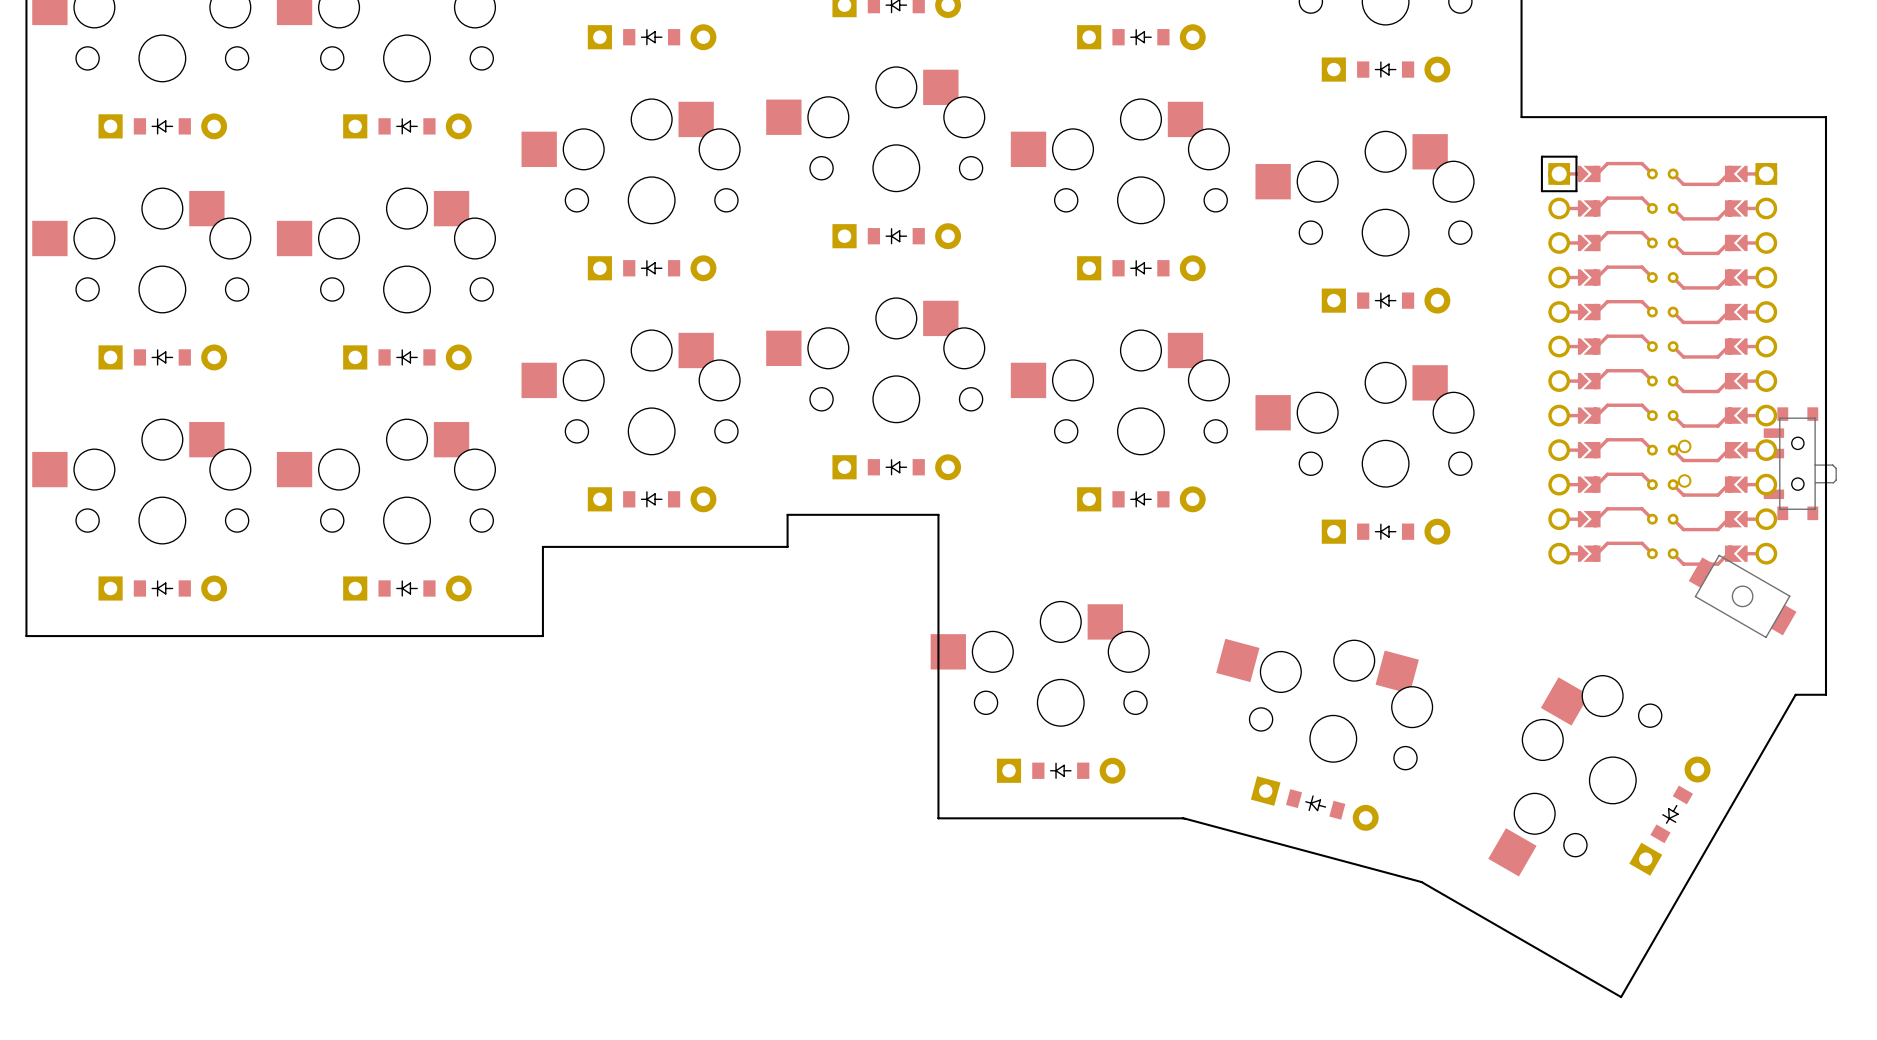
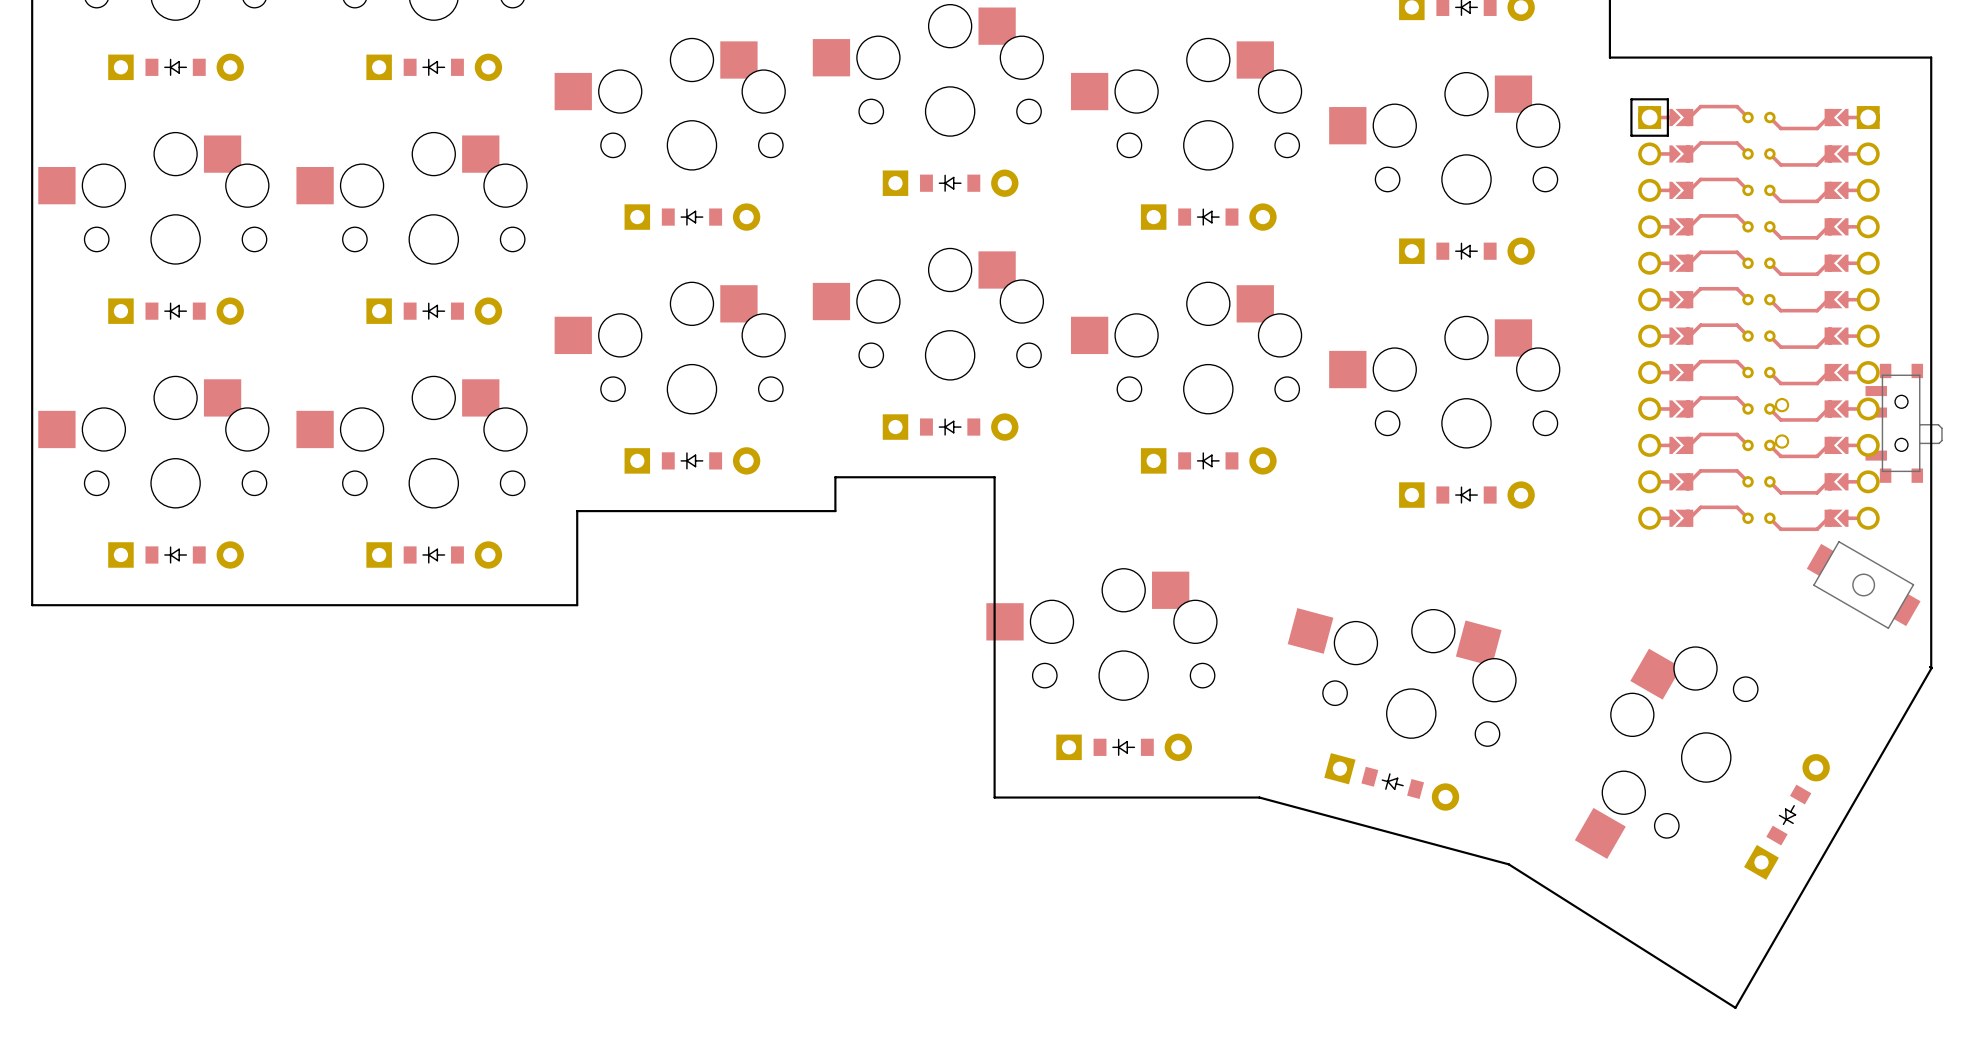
part position: (1742, 596) -> (1863, 584)
board edge: (1825, 694) (1795, 694) (1621, 997) (1421, 882) (1183, 818) -> (1930, 667) (1931, 667) (1735, 1007) (1508, 864) (1259, 797) (1252, 797)
part position: (1669, 816) -> (1786, 816)

